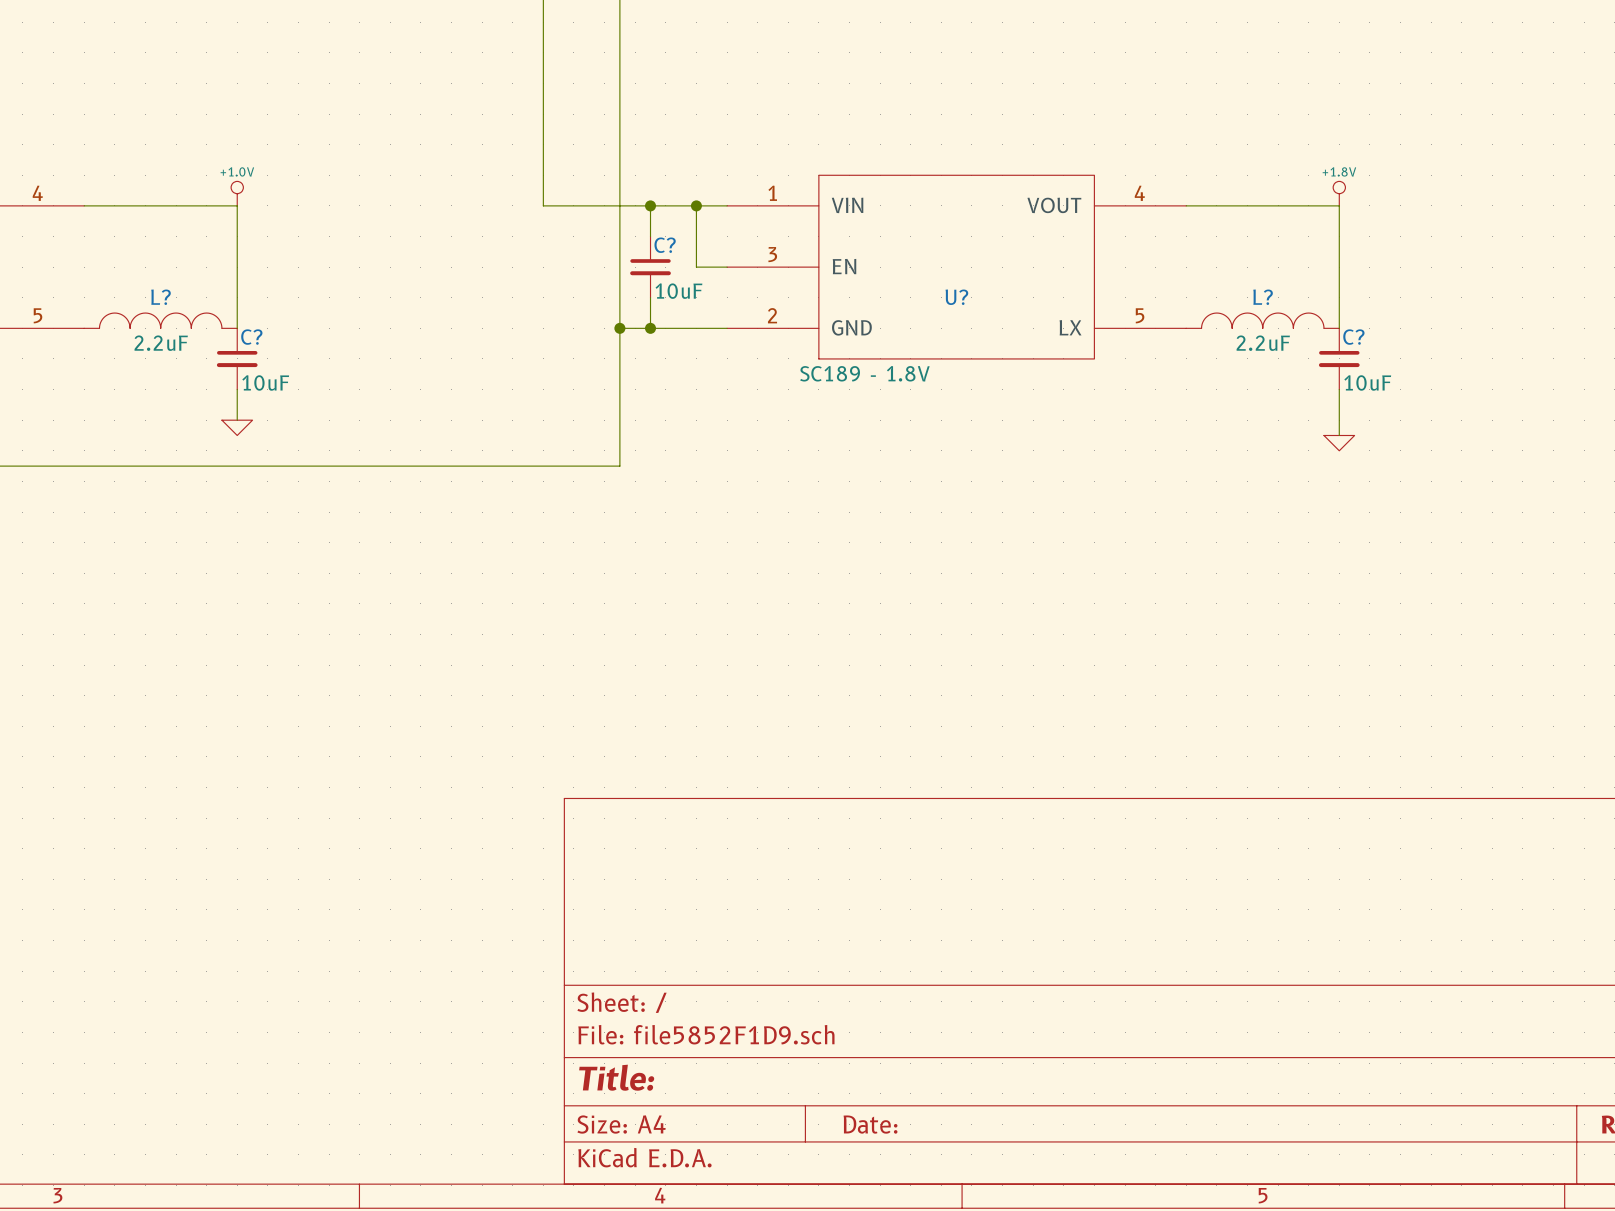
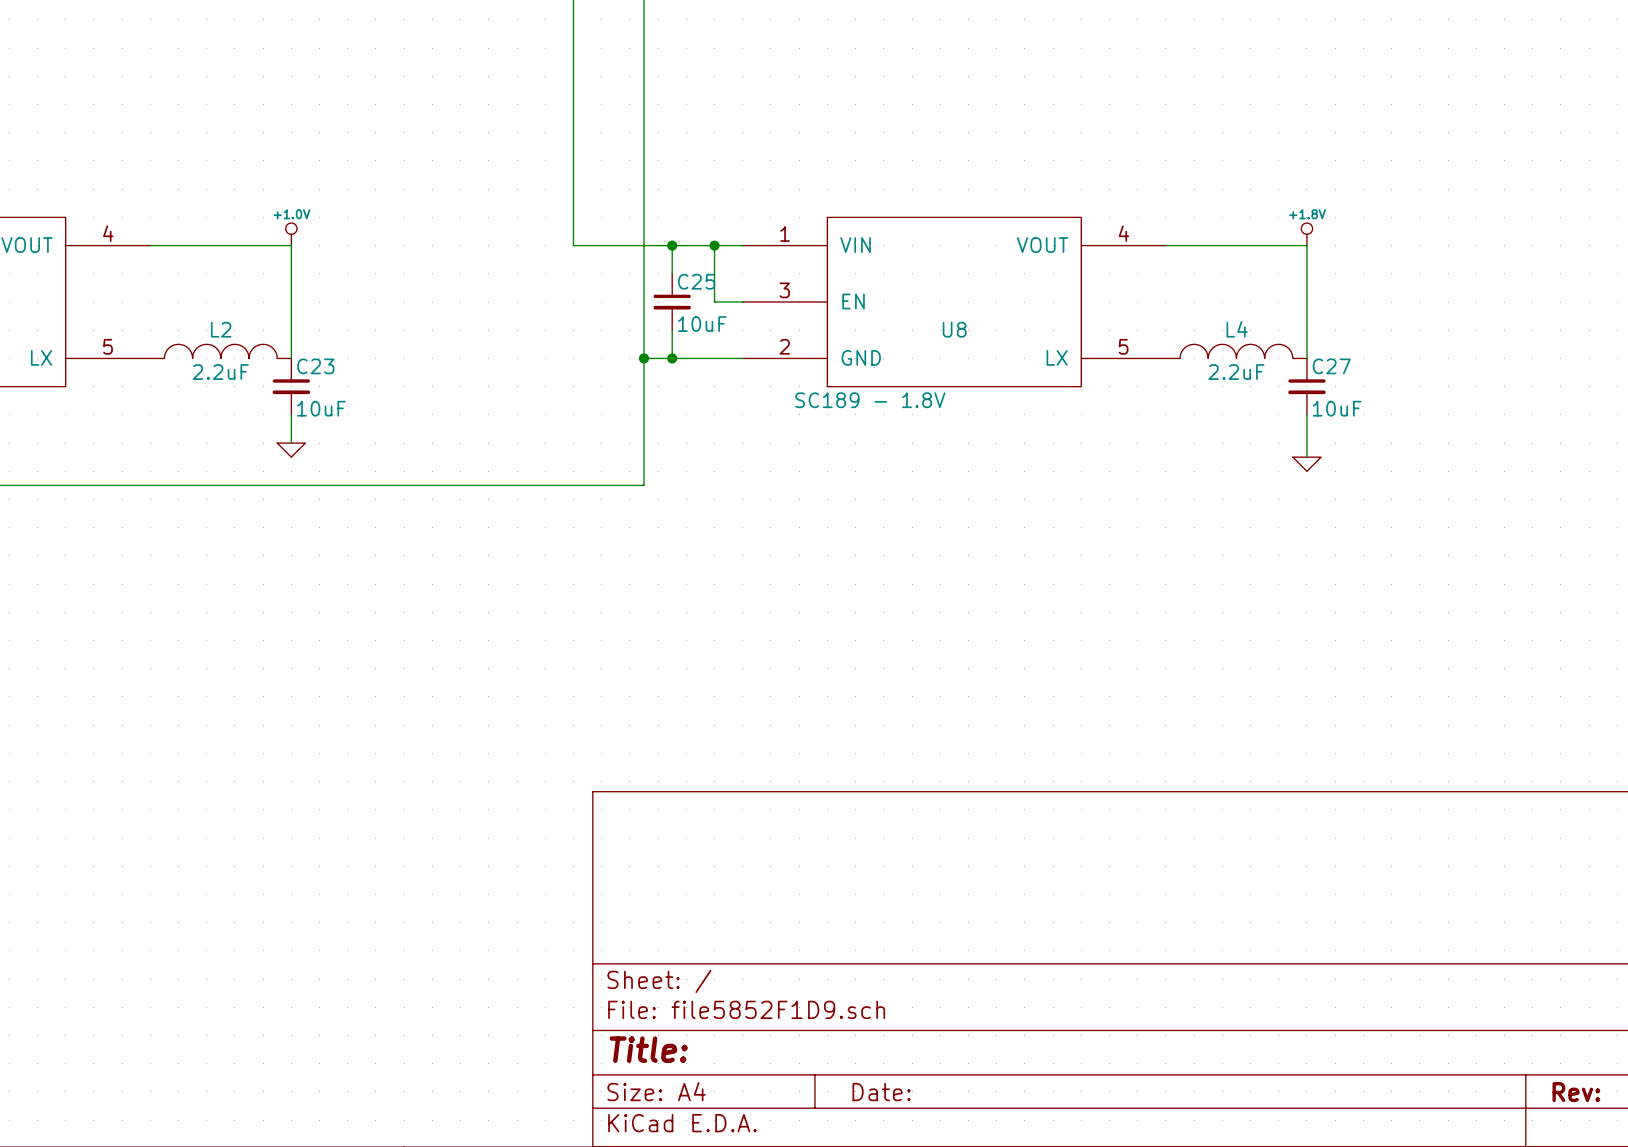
C? name: C? (665, 245) -> C25 (696, 281)
L? name: L? (161, 297) -> L2 (221, 329)
U? name: U? (956, 297) -> U8 (954, 329)
L? name: L? (1263, 297) -> L4 (1237, 329)
C? name: C? (251, 337) -> C23 (315, 366)
C? name: C? (1353, 337) -> C27 (1331, 366)

